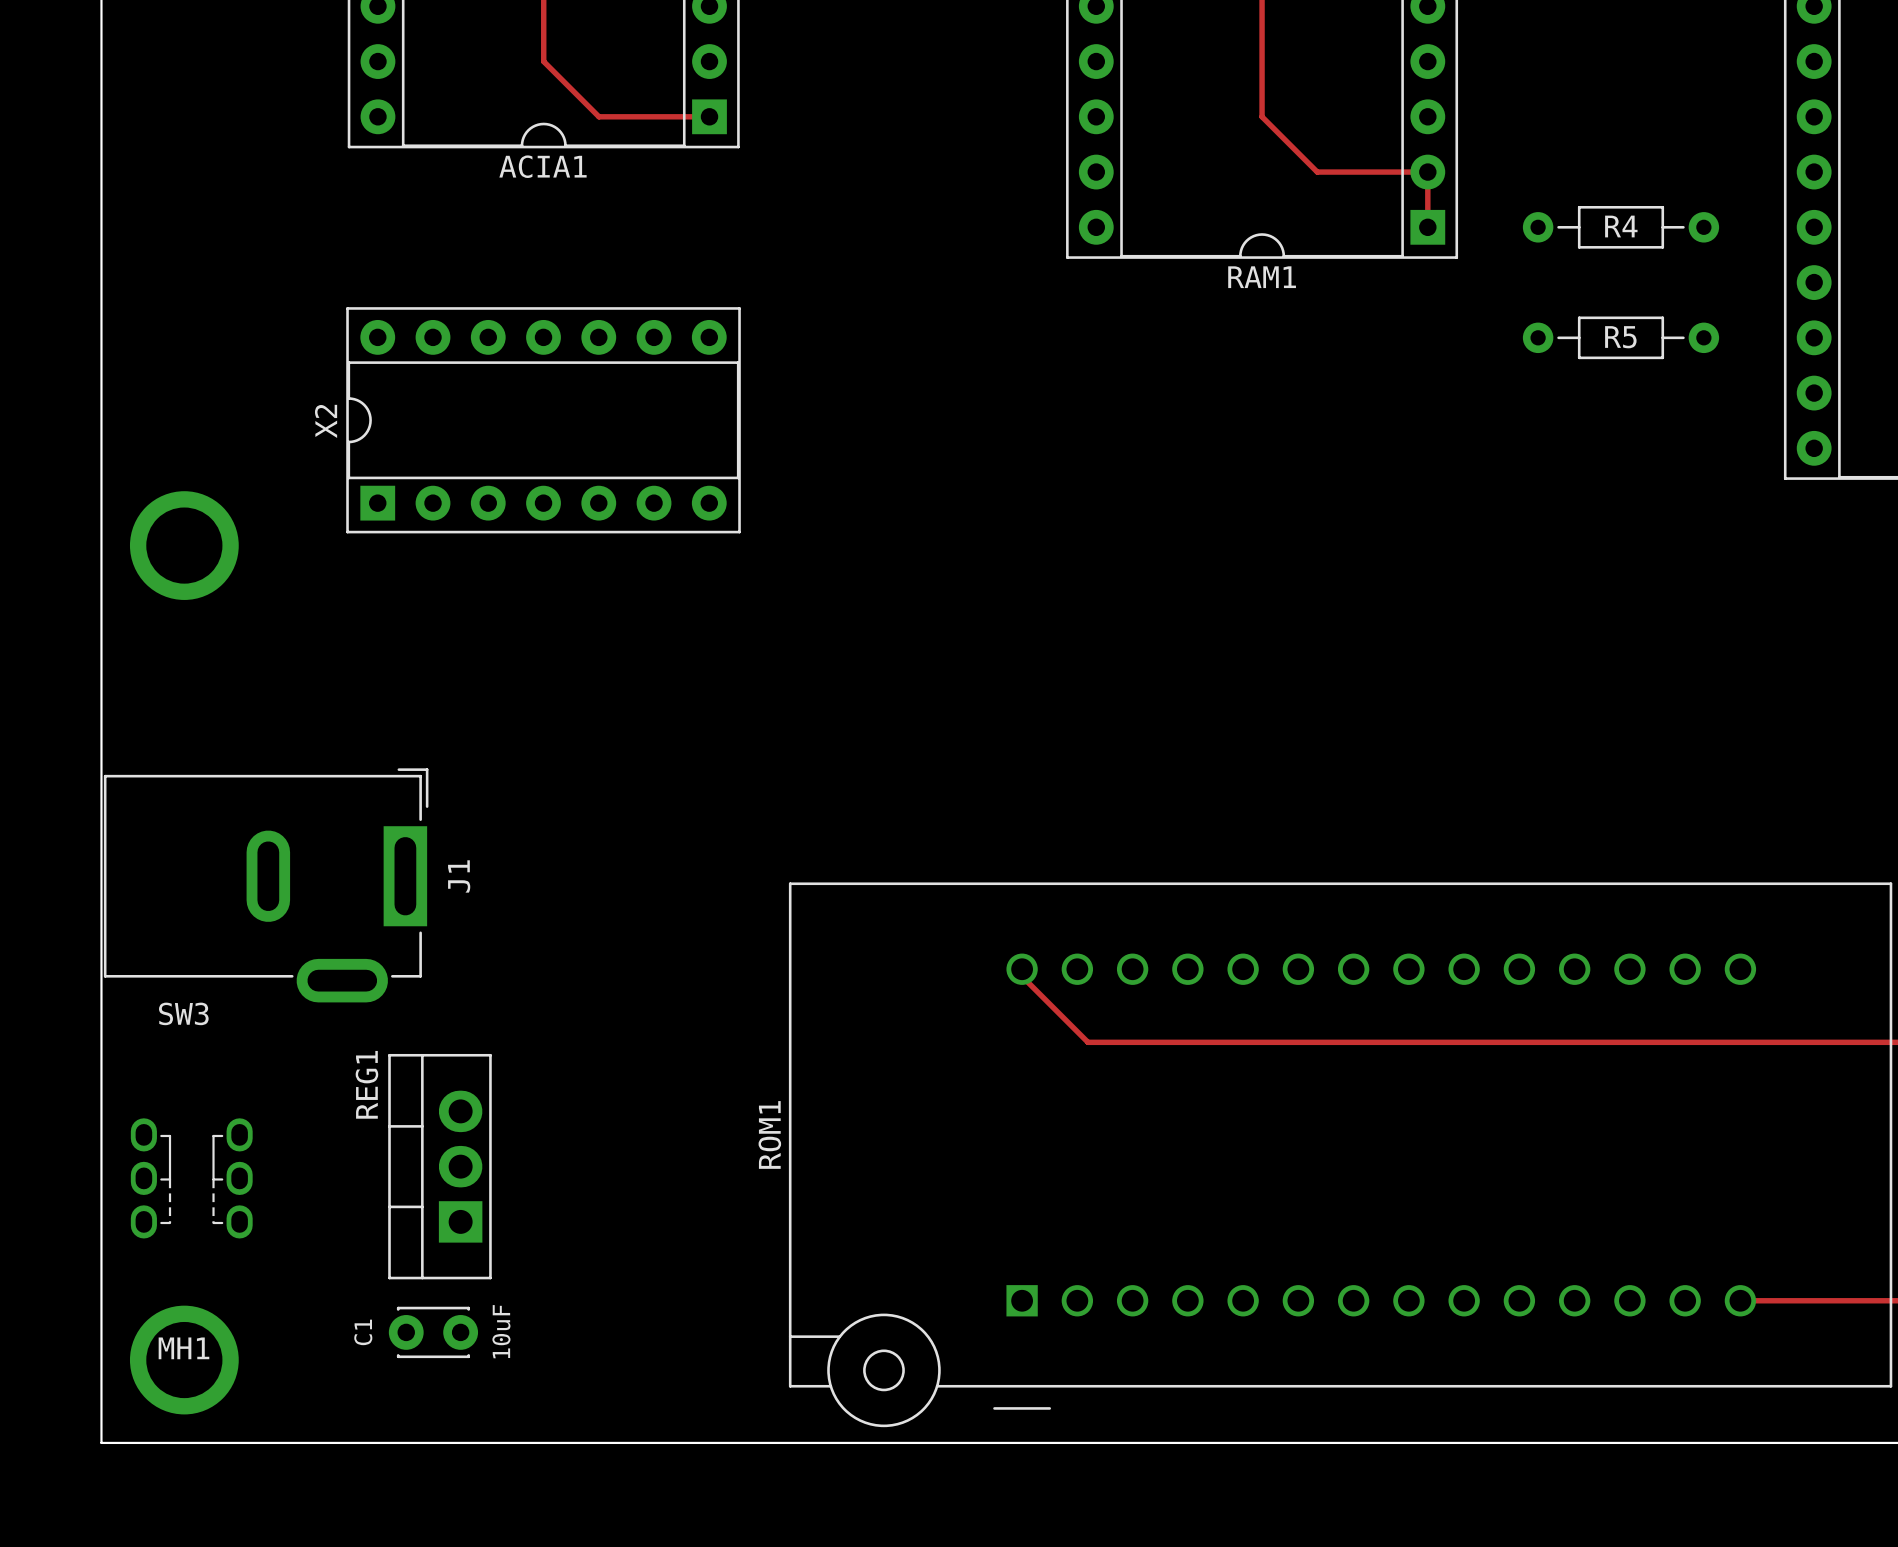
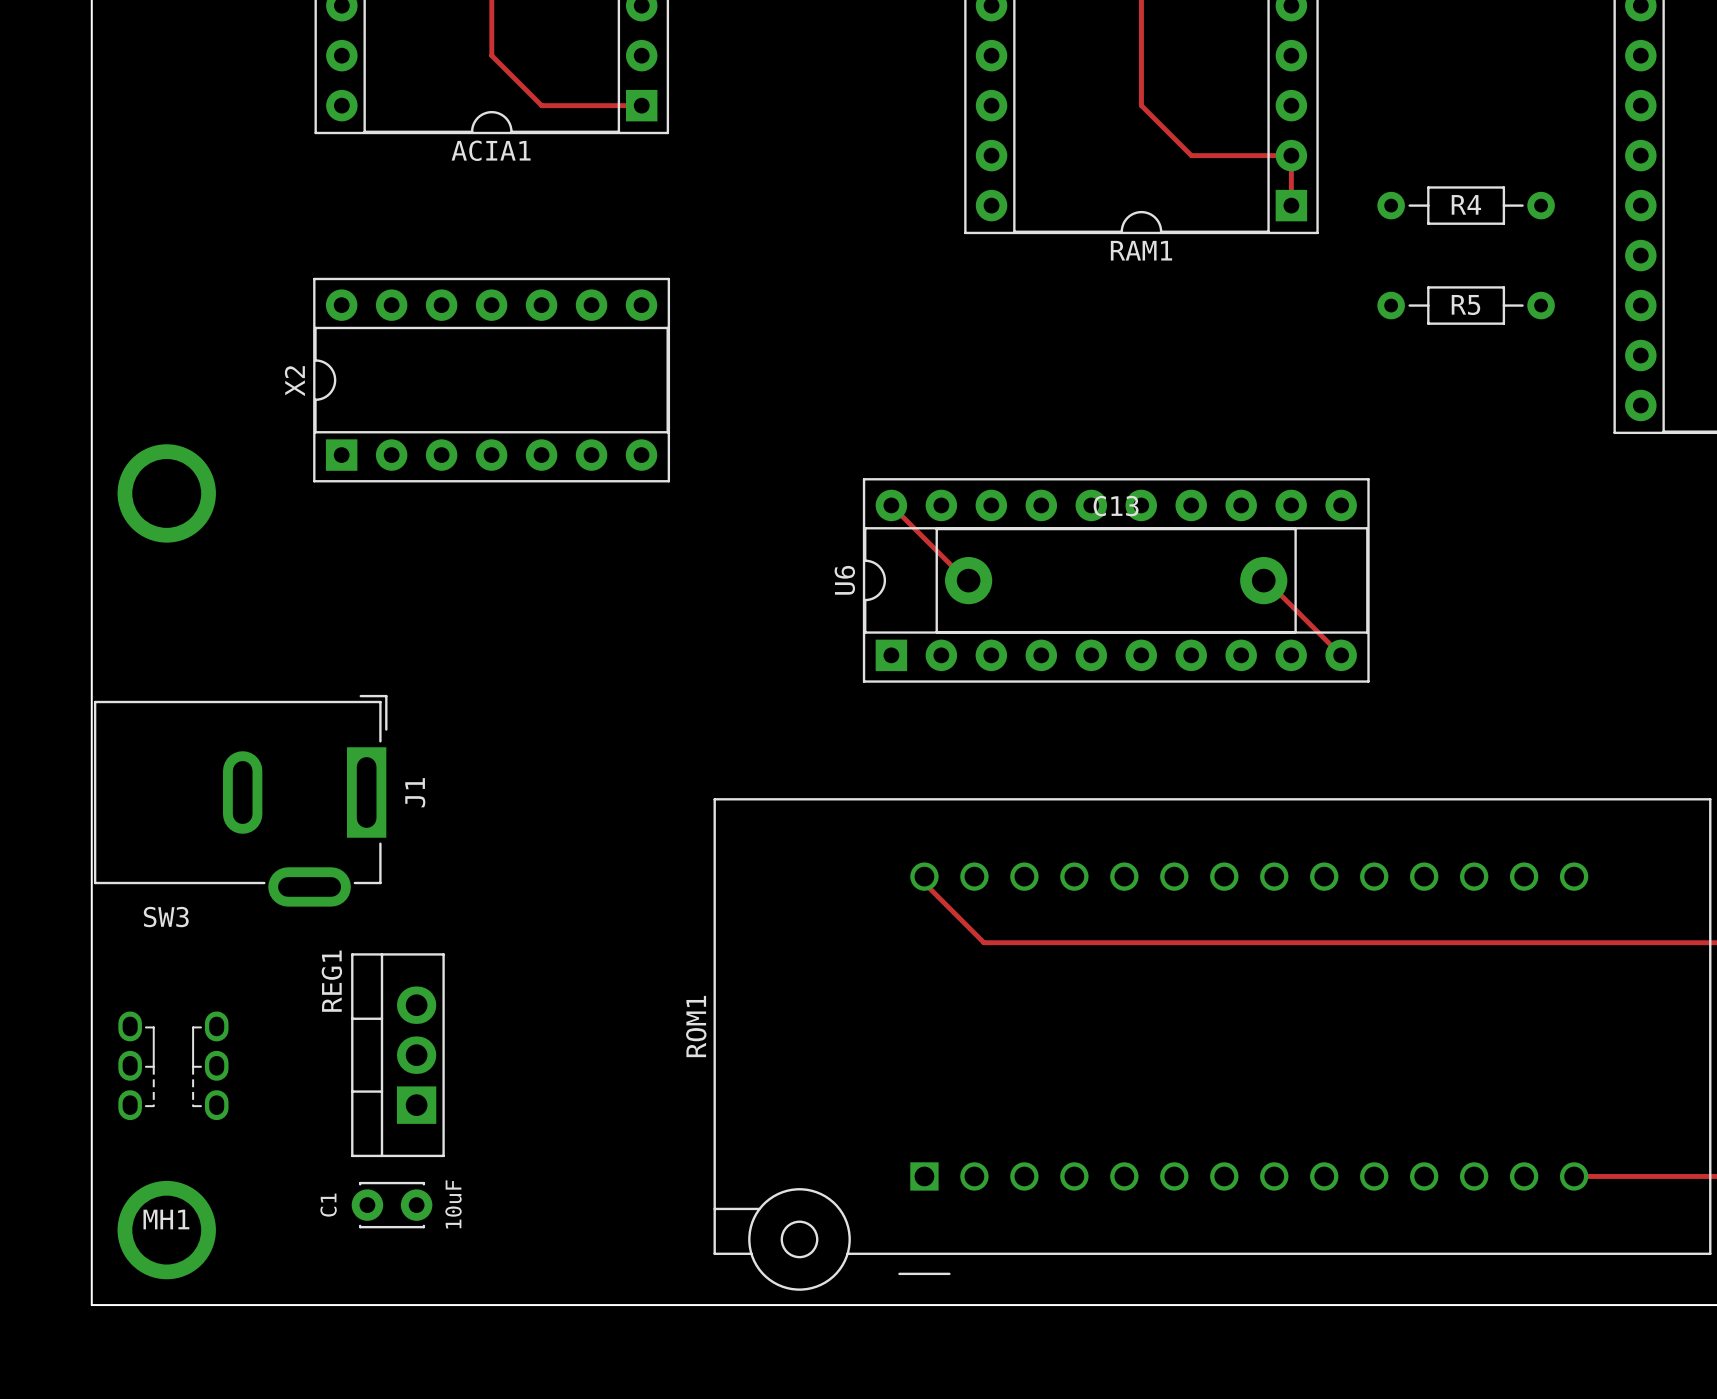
top track: none -> (891, 505) (968, 580)
U6: none -> (1116, 580)
C13: none -> (1116, 580)
top track: none -> (1263, 580) (1266, 580) (1341, 655)

